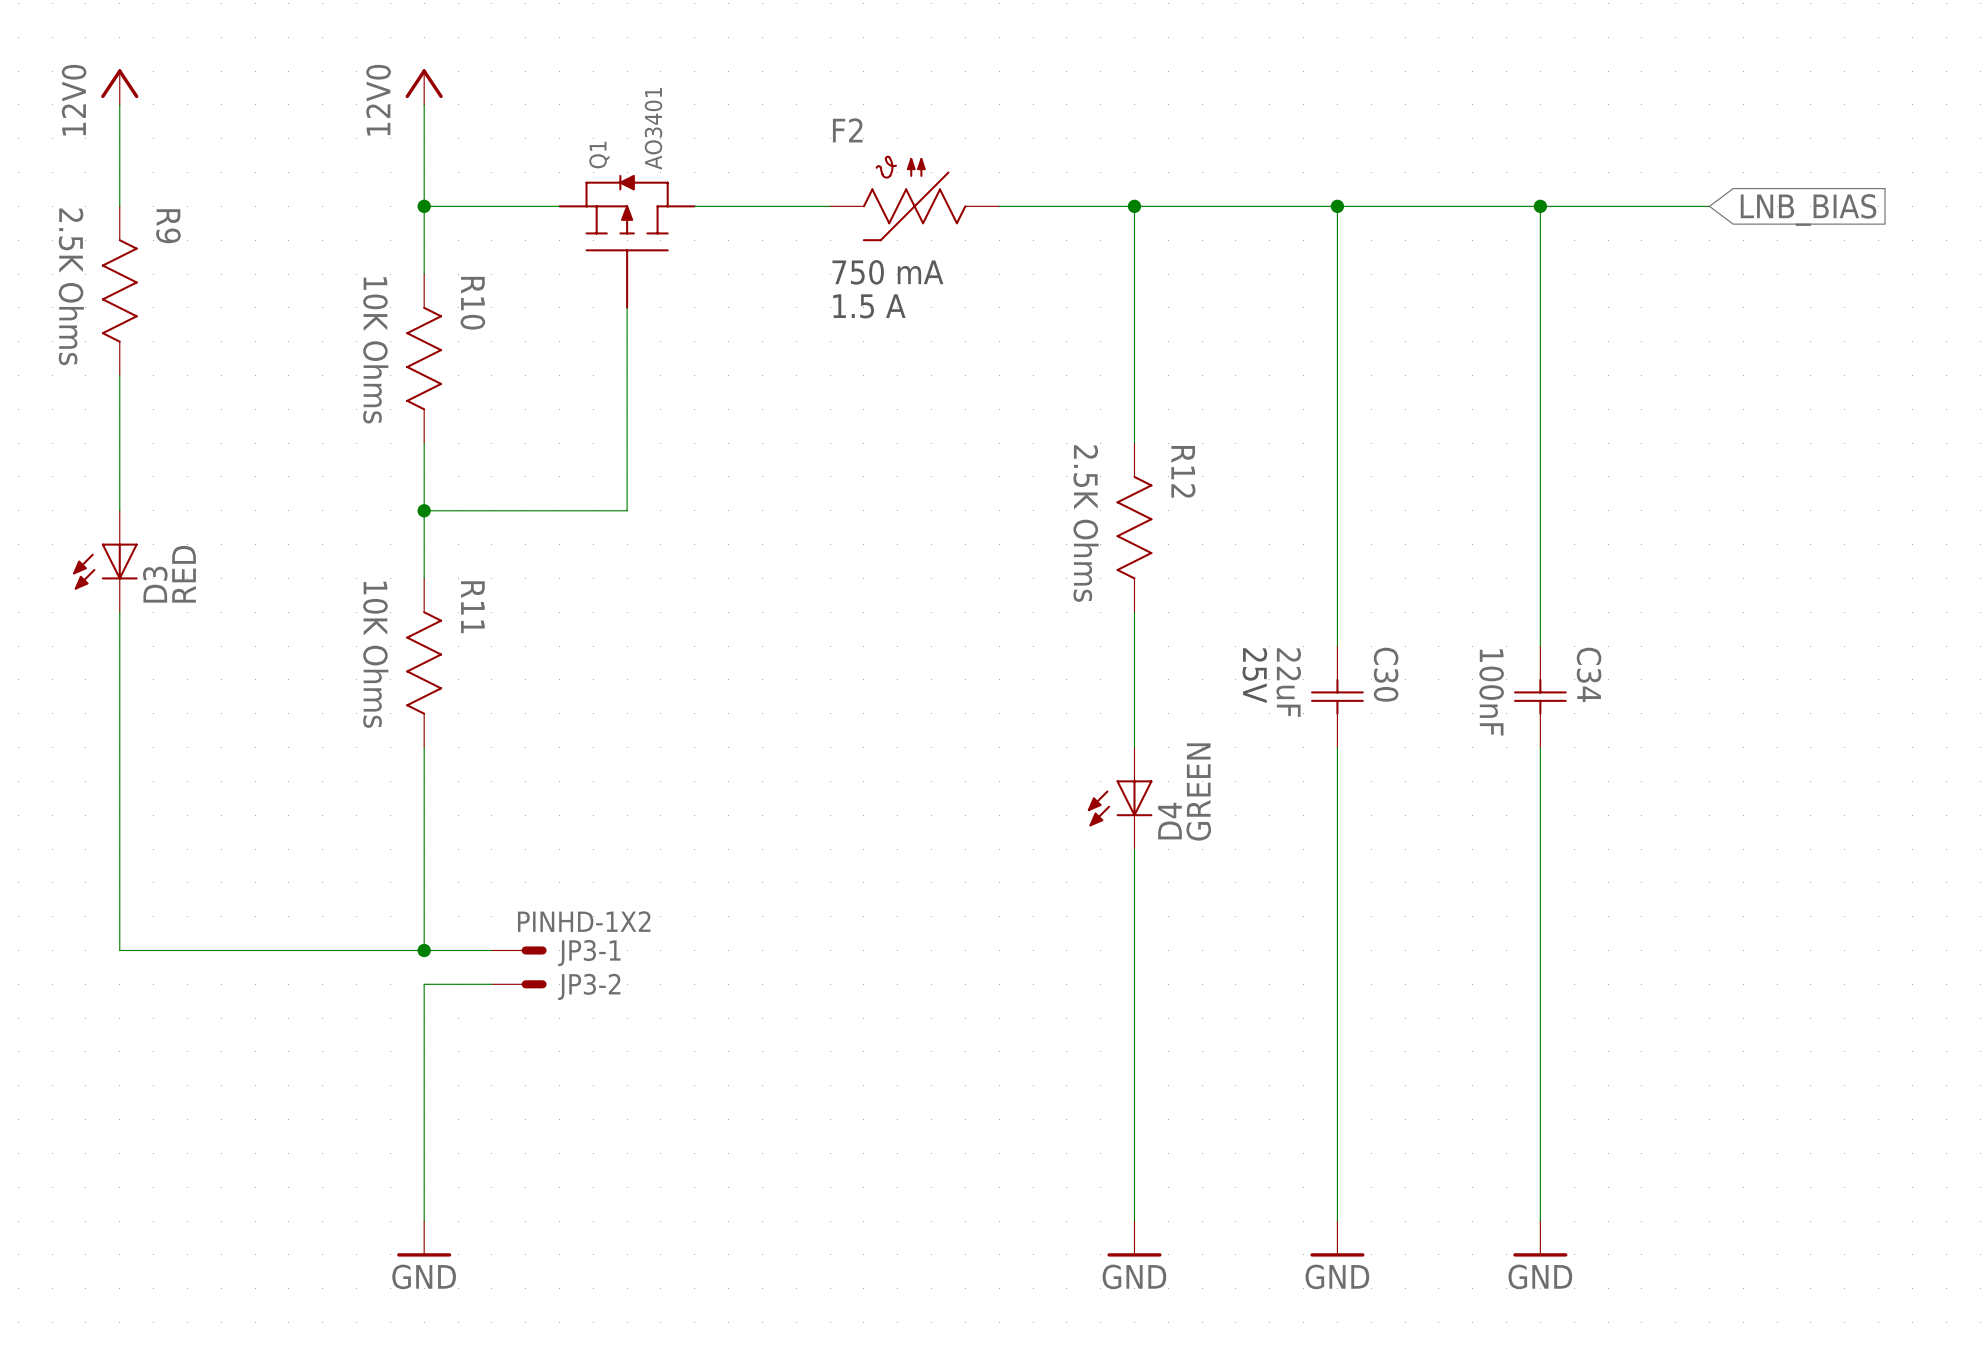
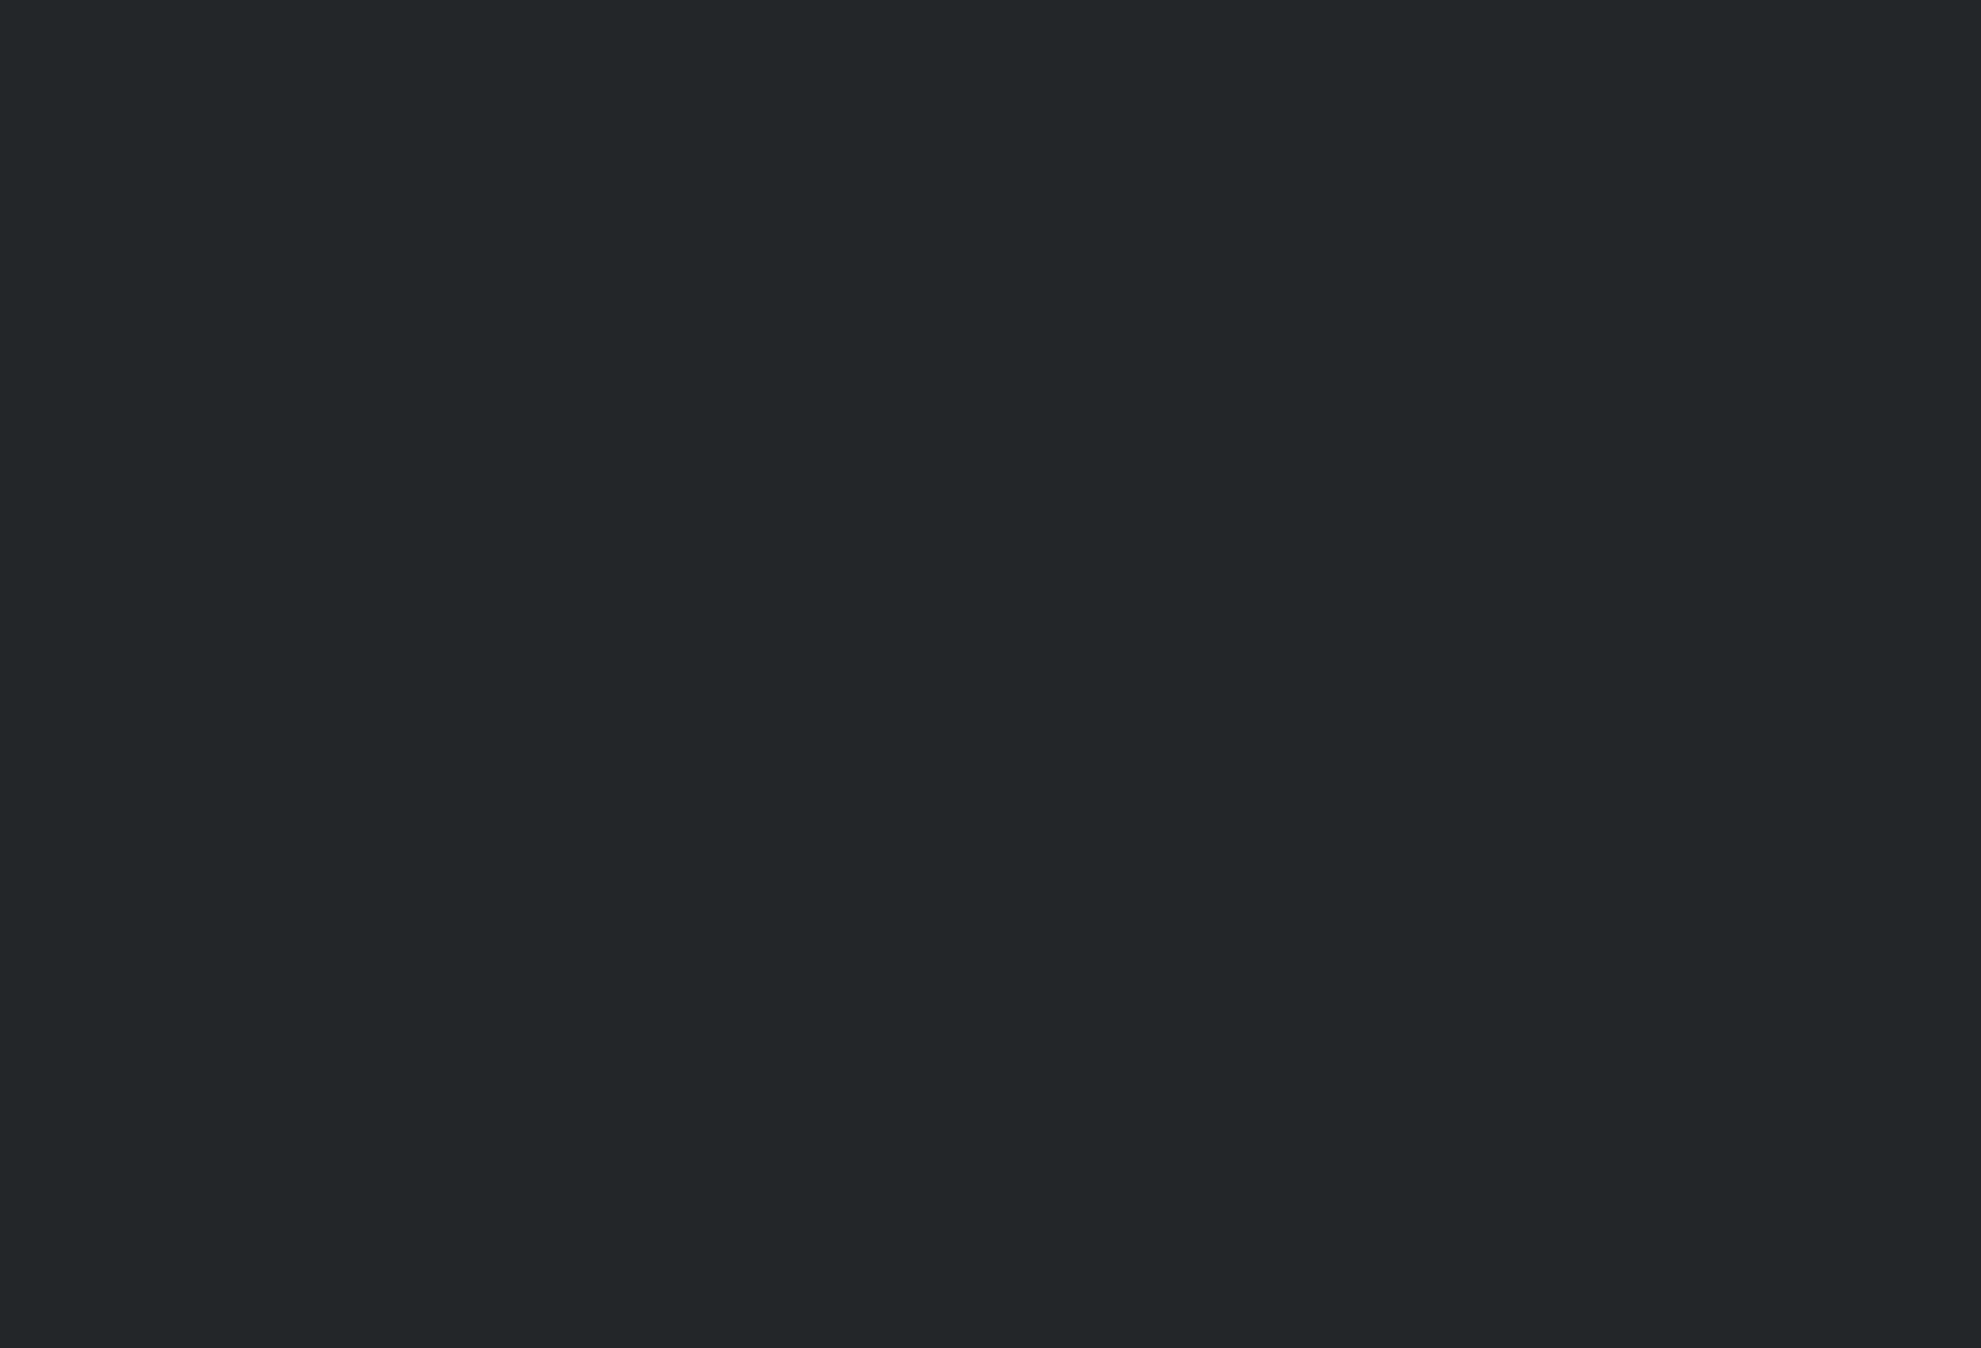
power symbol: 12V0 (119, 87) -> none
power symbol: 12V0 (424, 87) -> none
wire: (119, 104) (119, 206) -> none
wire: (424, 104) (424, 274) -> none
F2: (914, 198) -> none
wire: (424, 206) (559, 206) -> none
junction: (424, 206) -> none
wire: (694, 206) (830, 206) -> none
wire: (999, 206) (1709, 206) -> none
wire: (1134, 206) (1134, 443) -> none
junction: (1134, 206) -> none
wire: (1337, 206) (1337, 646) -> none
junction: (1337, 206) -> none
wire: (1540, 206) (1540, 646) -> none
junction: (1540, 206) -> none
global label: LNB_BIAS (1808, 209) -> none
Q1: AO3401 (627, 241) -> none
R9: 2.5K Ohms (119, 290) -> none
wire: (627, 307) (627, 510) (424, 510) -> none
R10: 10K Ohms (424, 358) -> none
wire: (119, 375) (119, 510) -> none
wire: (424, 443) (424, 578) -> none
junction: (424, 510) -> none
R12: 2.5K Ohms (1134, 527) -> none
D3: (105, 561) -> none
wire: (119, 612) (119, 950) (491, 950) -> none
wire: (1134, 612) (1134, 747) -> none
R11: 10K Ohms (424, 662) -> none
C30: 22uF (1337, 696) -> none
C34: 100nF (1540, 696) -> none
wire: (424, 747) (424, 950) -> none
wire: (1337, 747) (1337, 1221) -> none
wire: (1540, 747) (1540, 1221) -> none
D4: (1120, 798) -> none
wire: (1134, 849) (1134, 1221) -> none
junction: (424, 950) -> none
JP3-1: PINHD-1X2 (519, 950) -> none
wire: (491, 984) (424, 984) (424, 1221) -> none
JP3-2: (519, 984) -> none
power symbol: GND (424, 1238) -> none
power symbol: GND (1134, 1238) -> none
power symbol: GND (1337, 1238) -> none
power symbol: GND (1540, 1238) -> none

